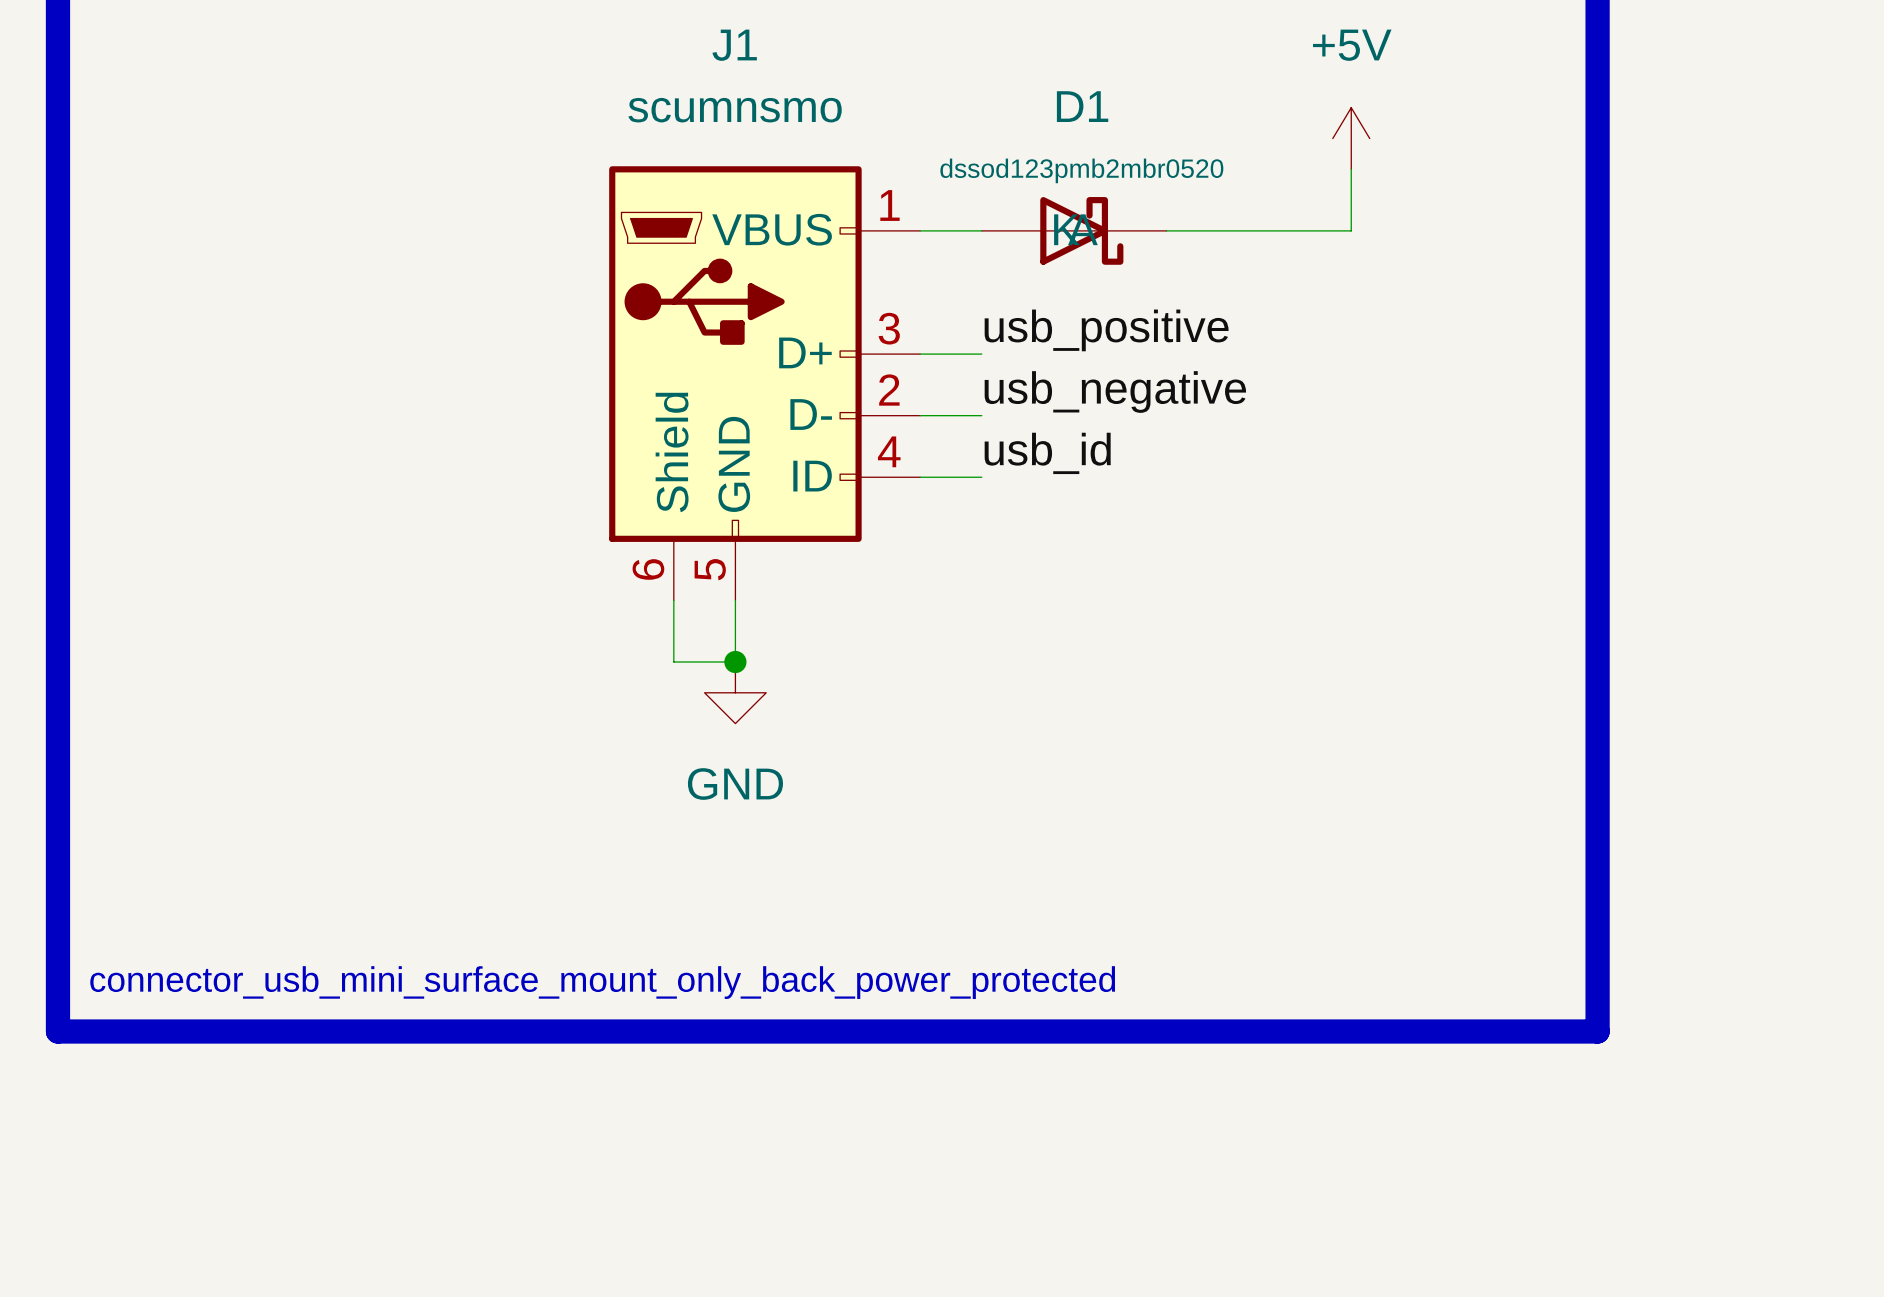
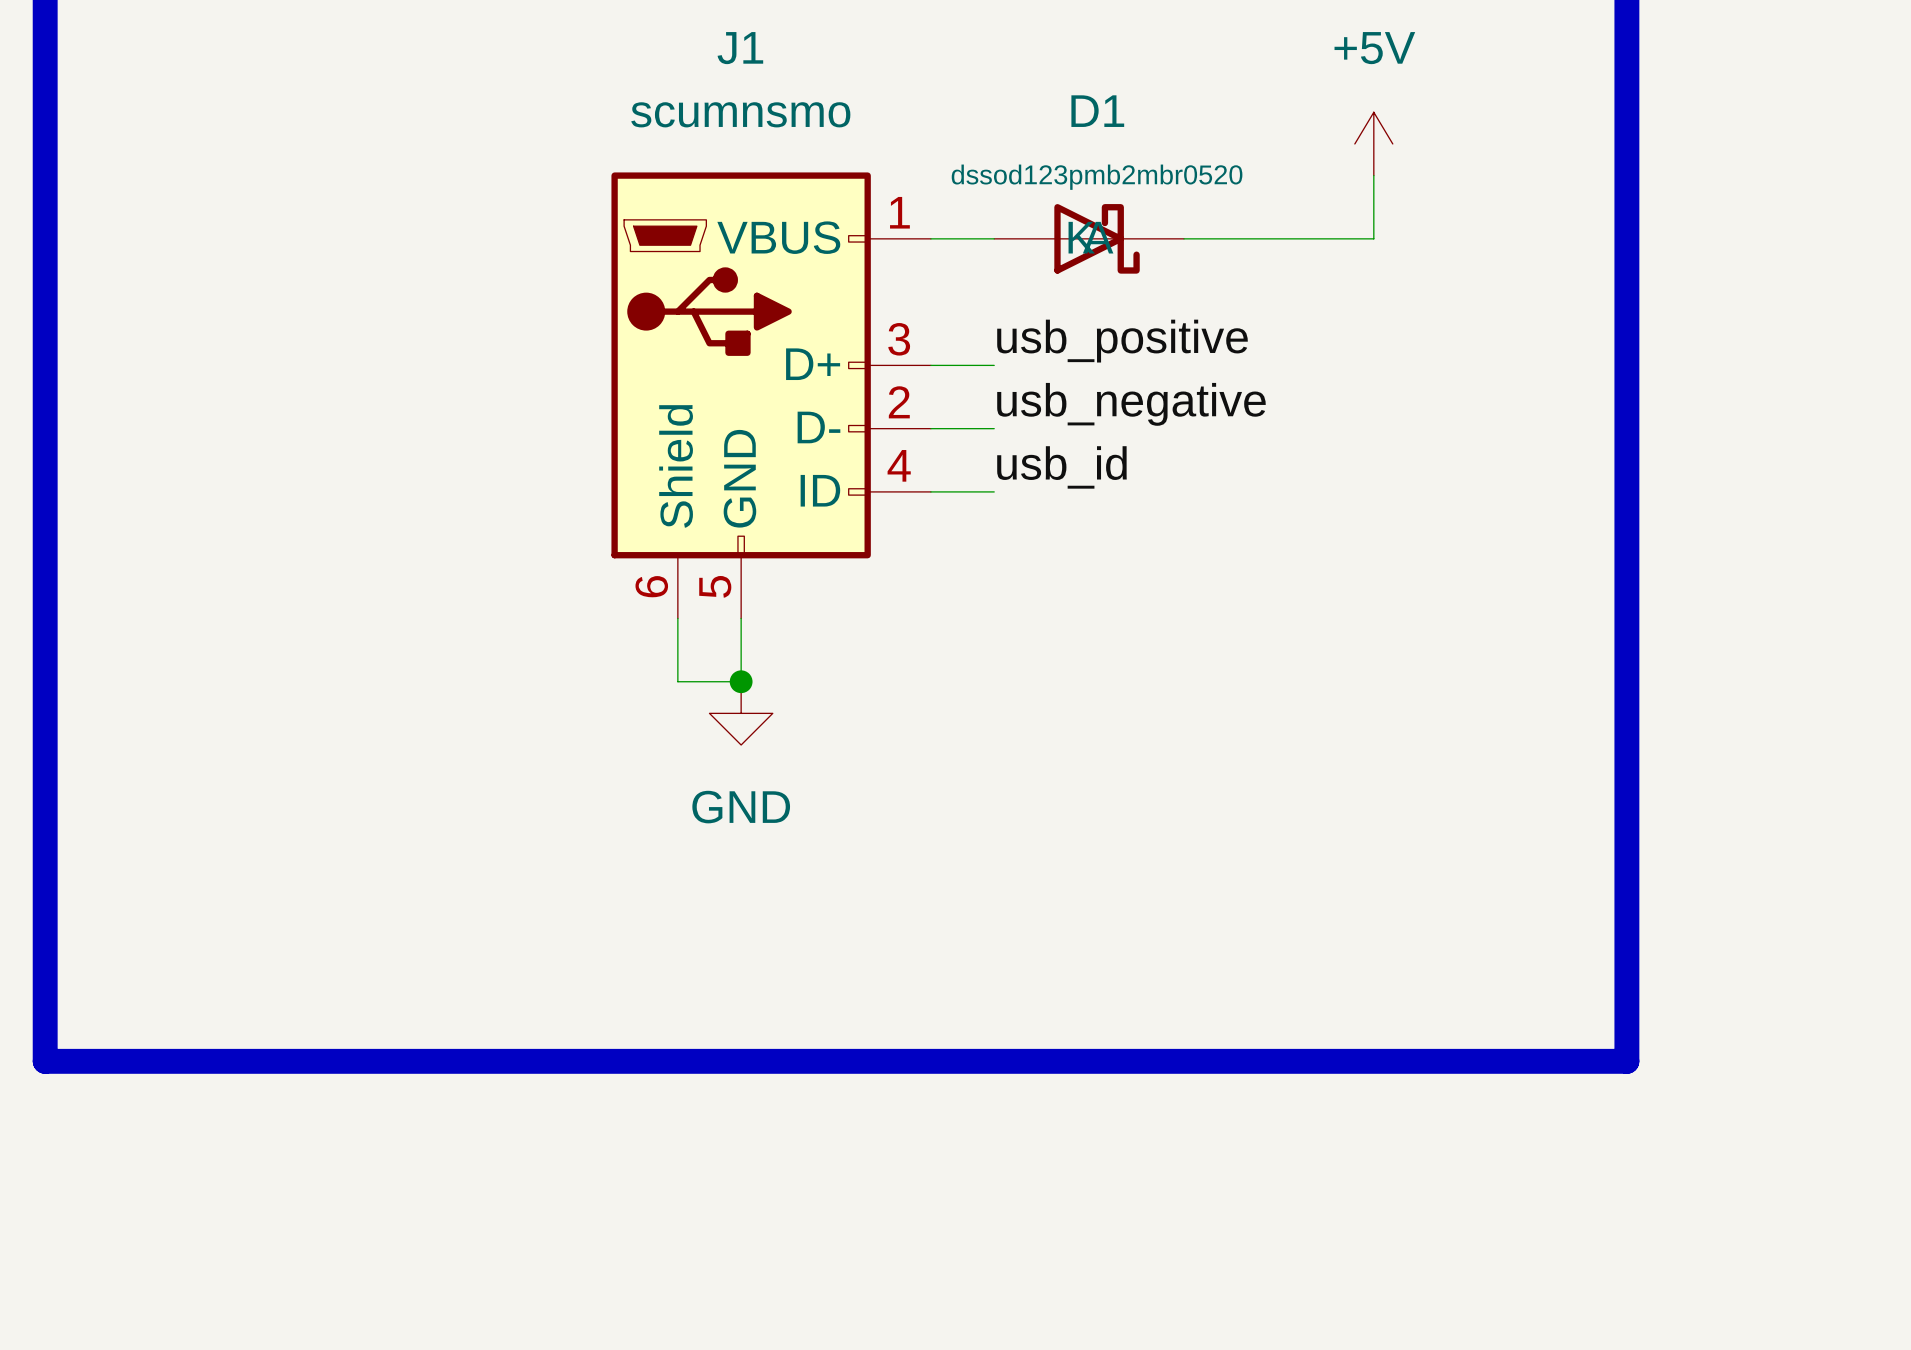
text: connector_usb_mini_surface_mount_only_back_power_protected (602, 982) -> none

